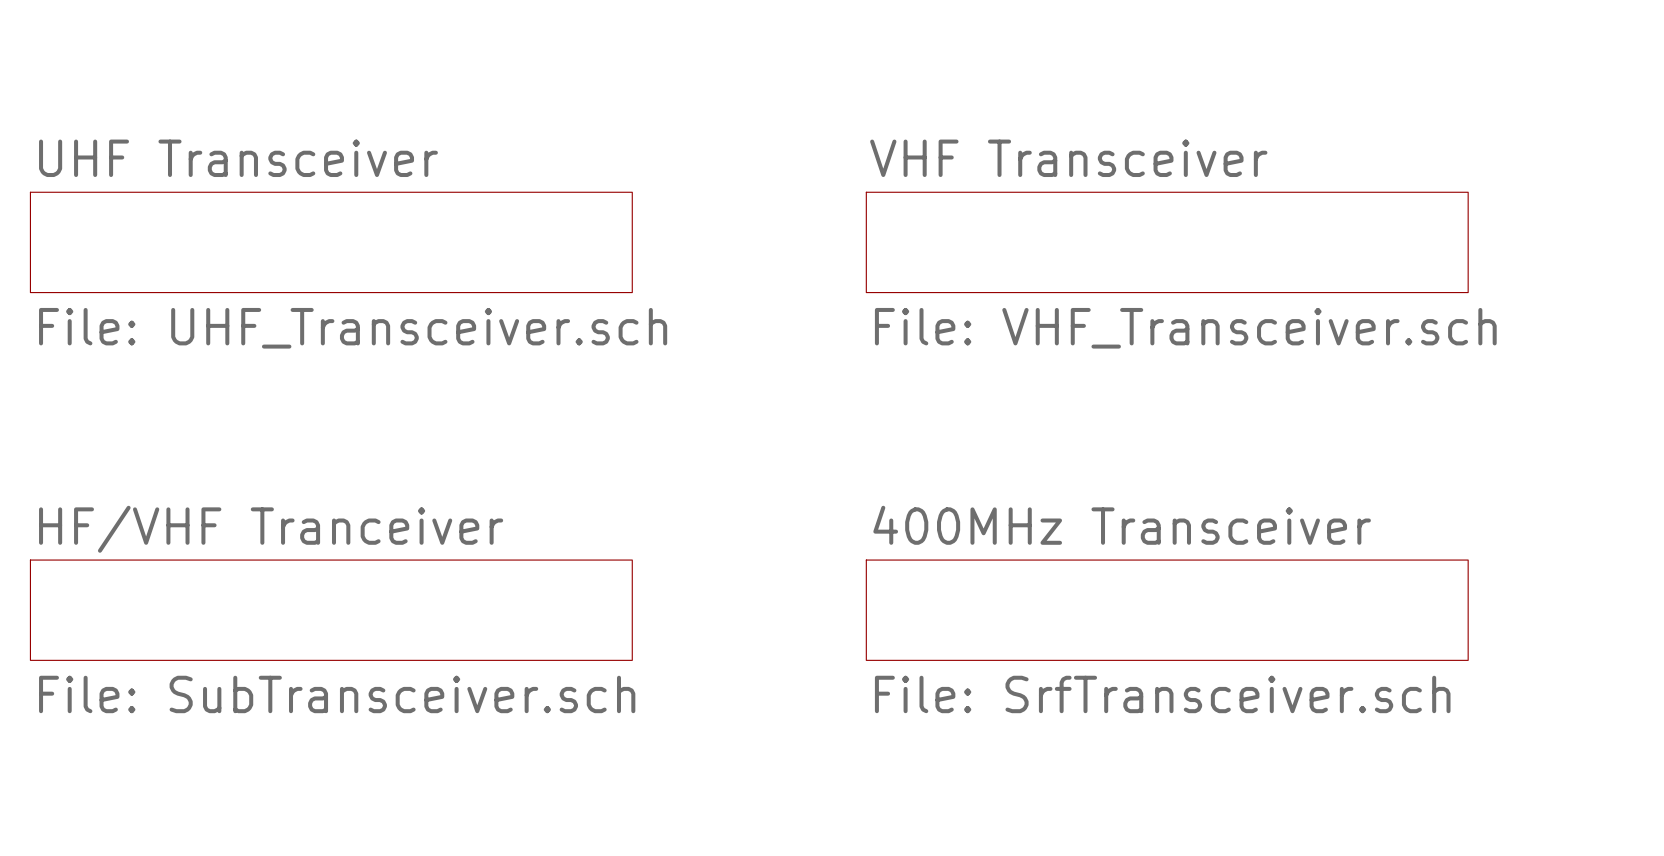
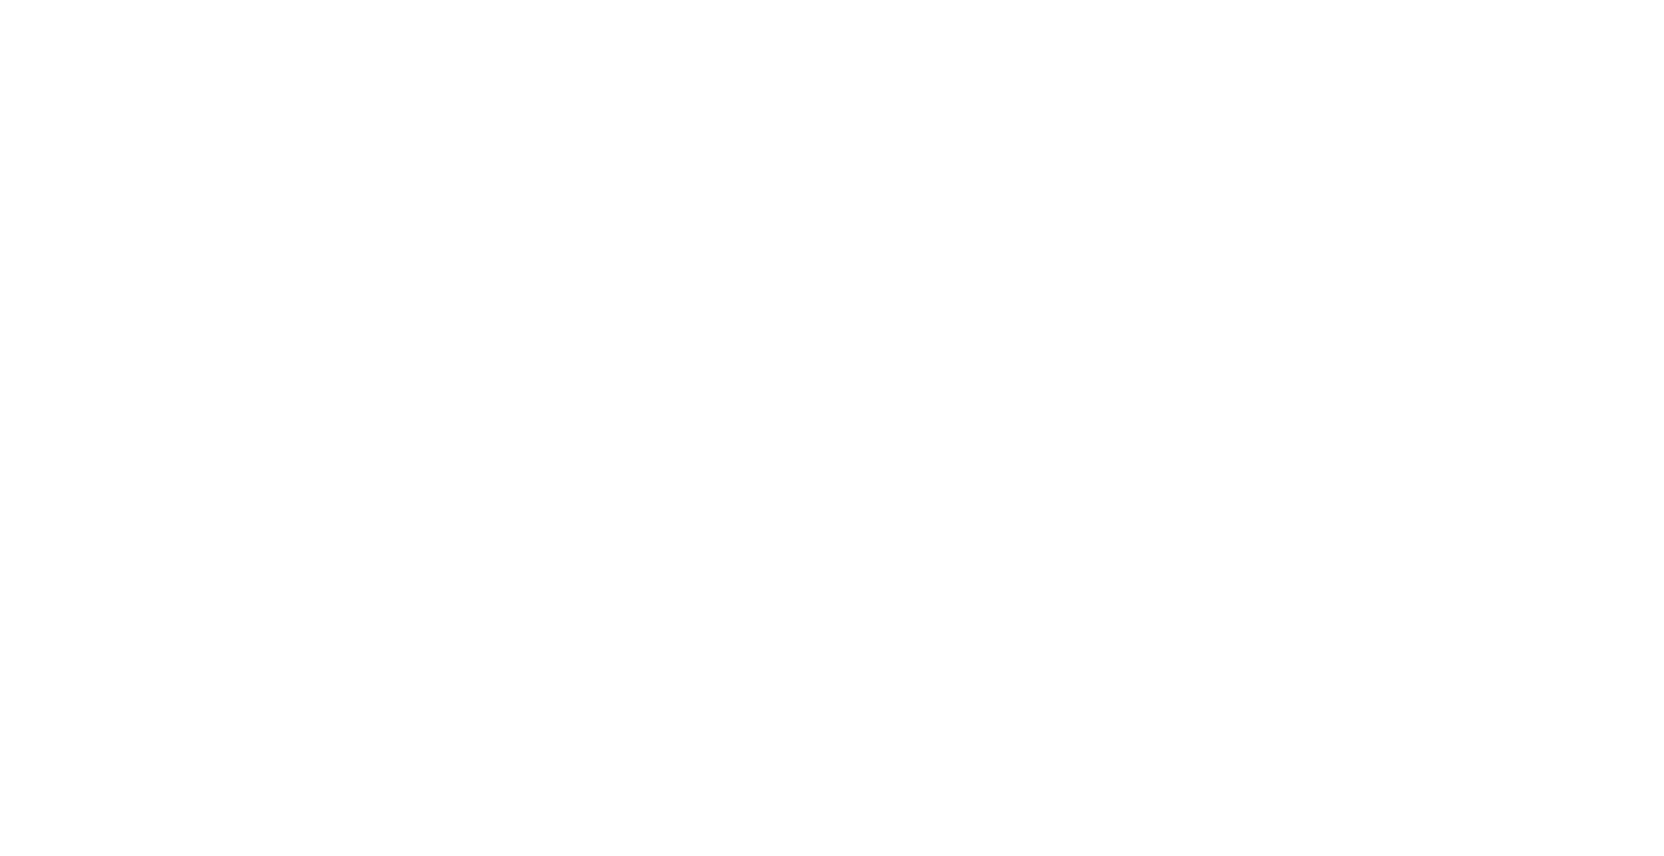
sheet UHF Transceiver: File: UHF_Transceiver.sch (331, 242) -> none
sheet VHF Transceiver: File: VHF_Transceiver.sch (1167, 242) -> none
sheet HF/VHF Tranceiver: File: SubTransceiver.sch (331, 610) -> none
sheet 400MHz Transceiver: File: SrfTransceiver.sch (1167, 610) -> none

